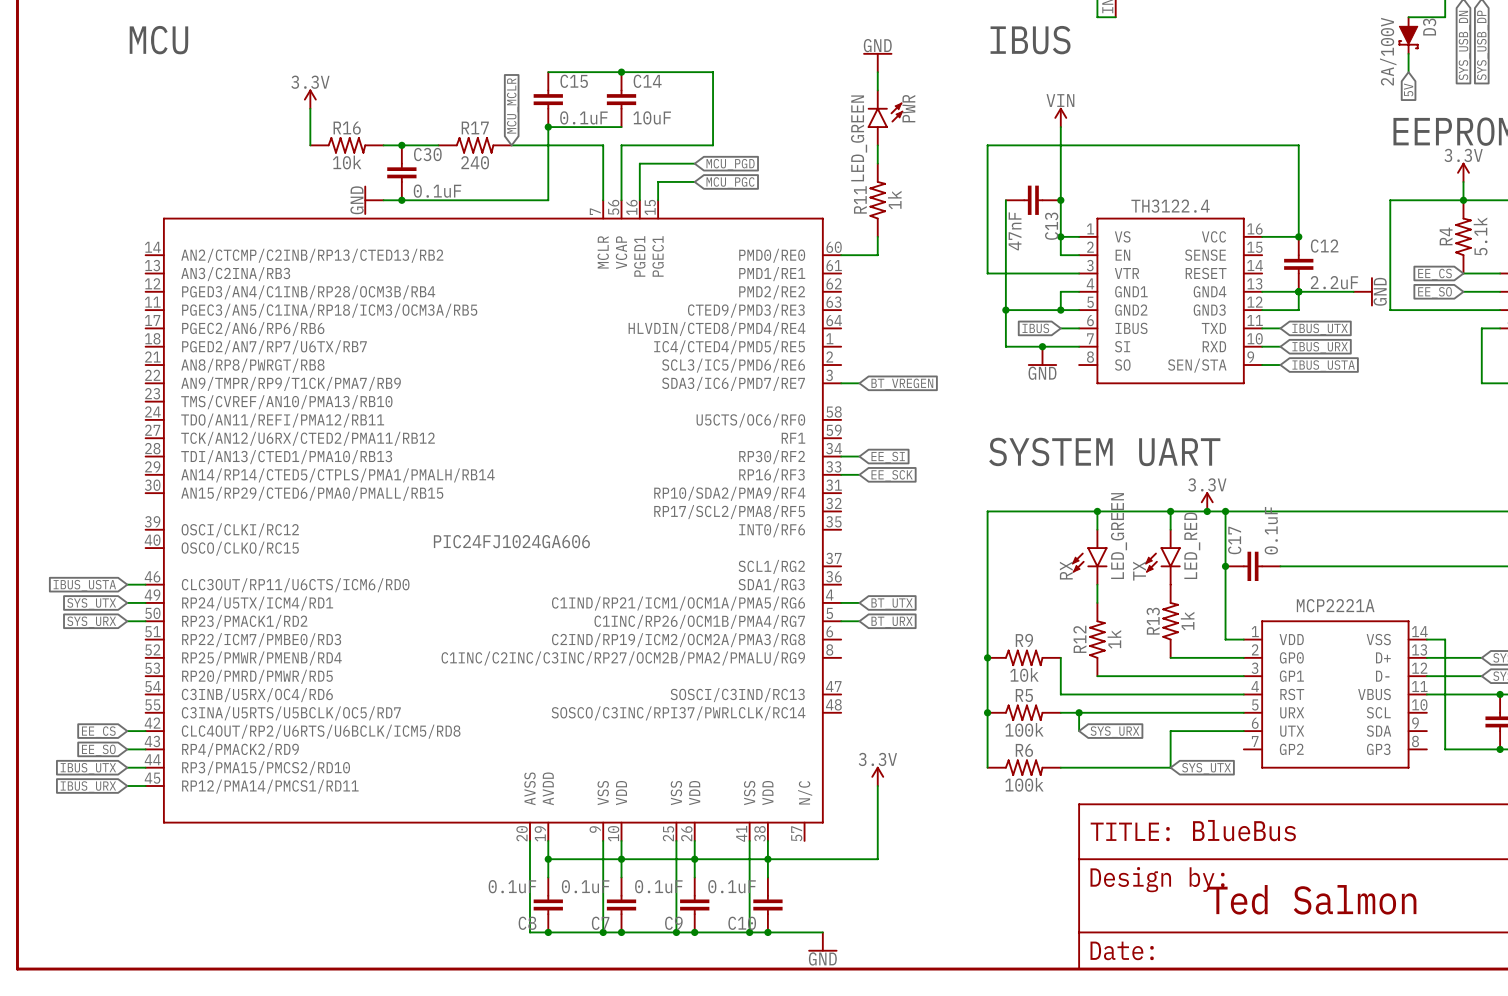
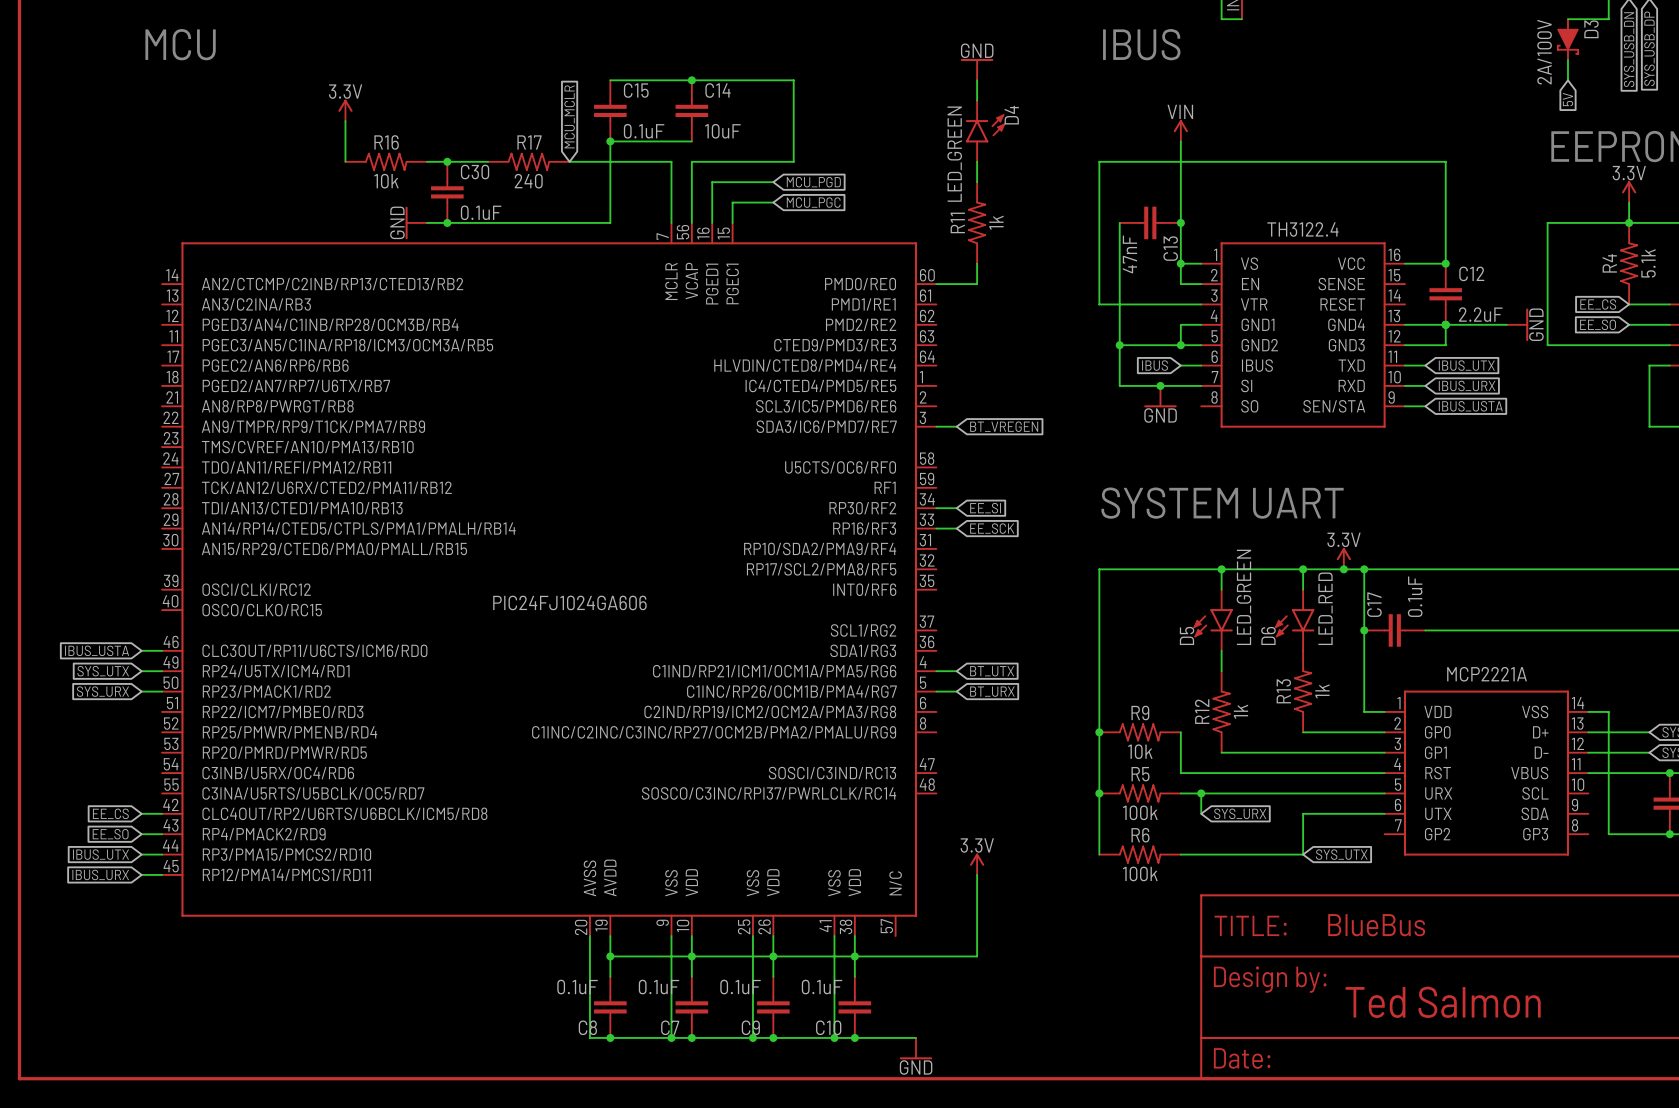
PWR name: PWR (908, 108) -> D4 (1011, 115)
RX name: RX (1066, 570) -> D5 (1187, 635)
TX name: TX (1139, 571) -> D6 (1268, 635)

